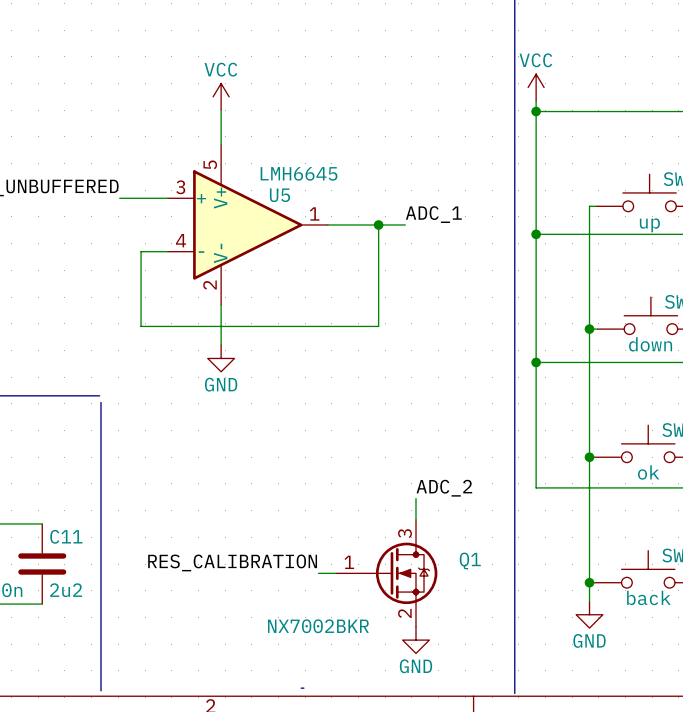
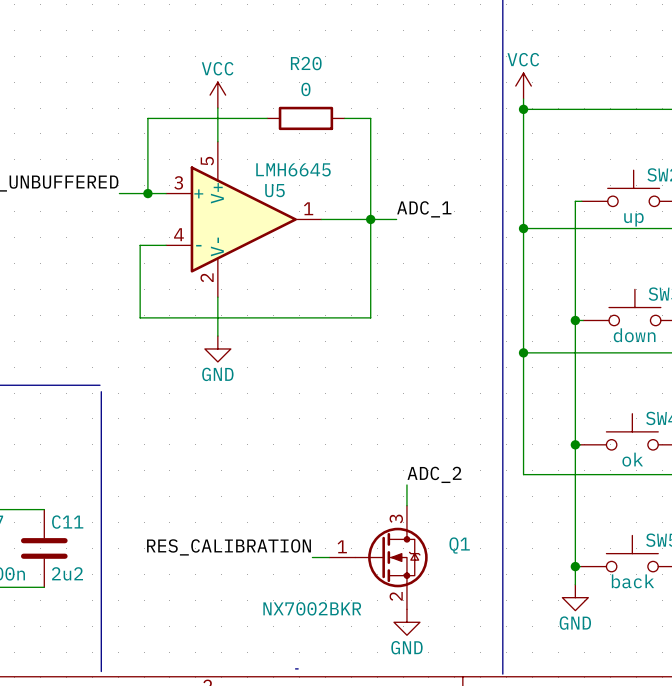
wire: none -> (267, 118) (147, 118) (147, 193)
R20: none -> 0 (305, 118)
wire: none -> (344, 118) (370, 118) (370, 219)
junction: none -> (147, 193)

